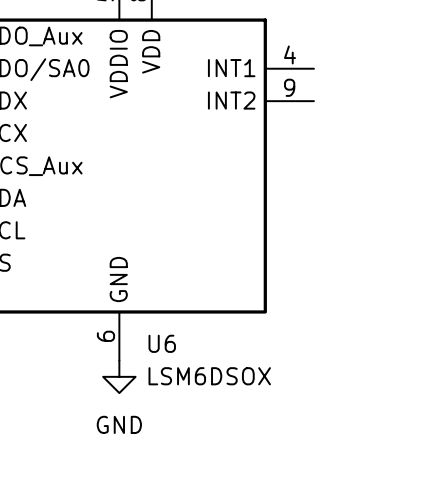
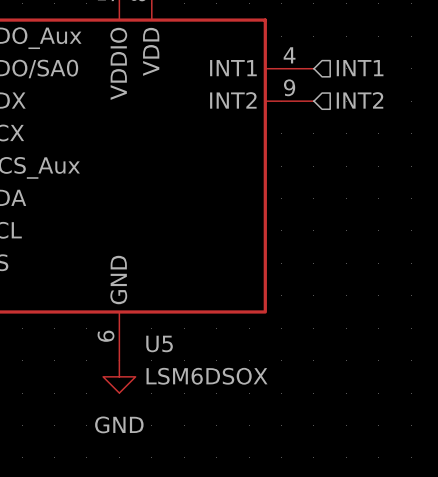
hierarchical label: none -> INT1 (360, 68)
hierarchical label: none -> INT2 (360, 100)
U6 name: U6 (162, 343) -> U5 (159, 343)

